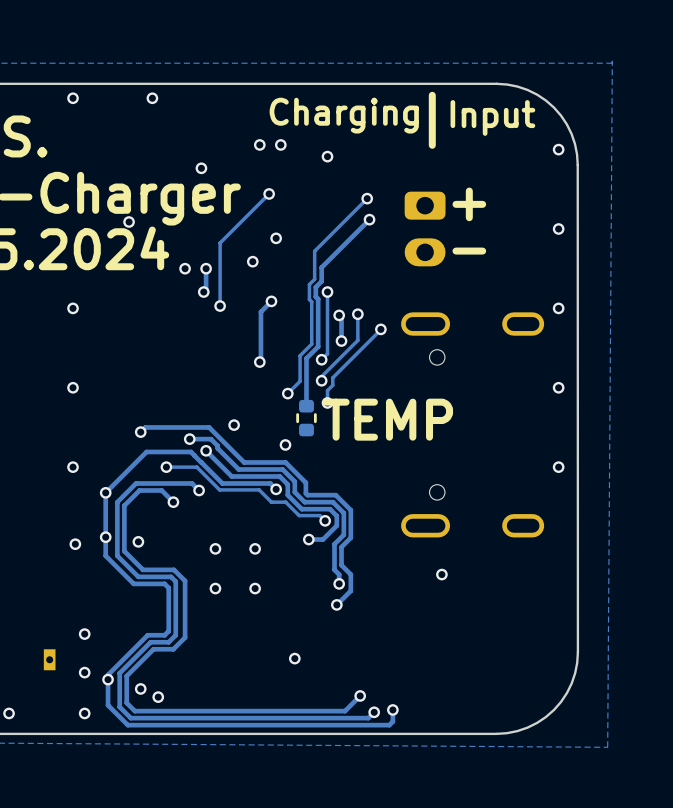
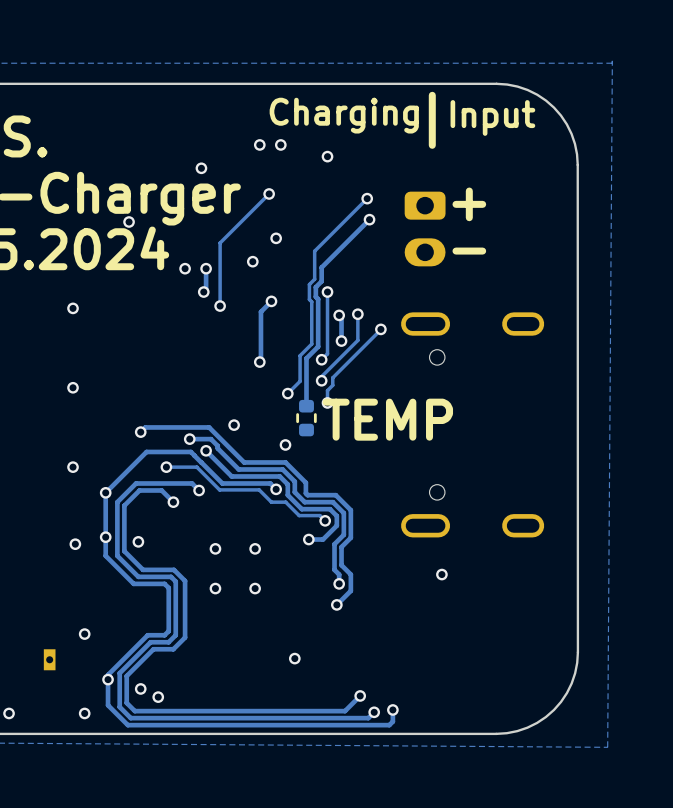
via: (73, 98) -> none
via: (152, 98) -> none
via: (558, 149) -> none
via: (558, 229) -> none
via: (558, 308) -> none
via: (558, 387) -> none
via: (558, 467) -> none
via: (84, 672) -> none

